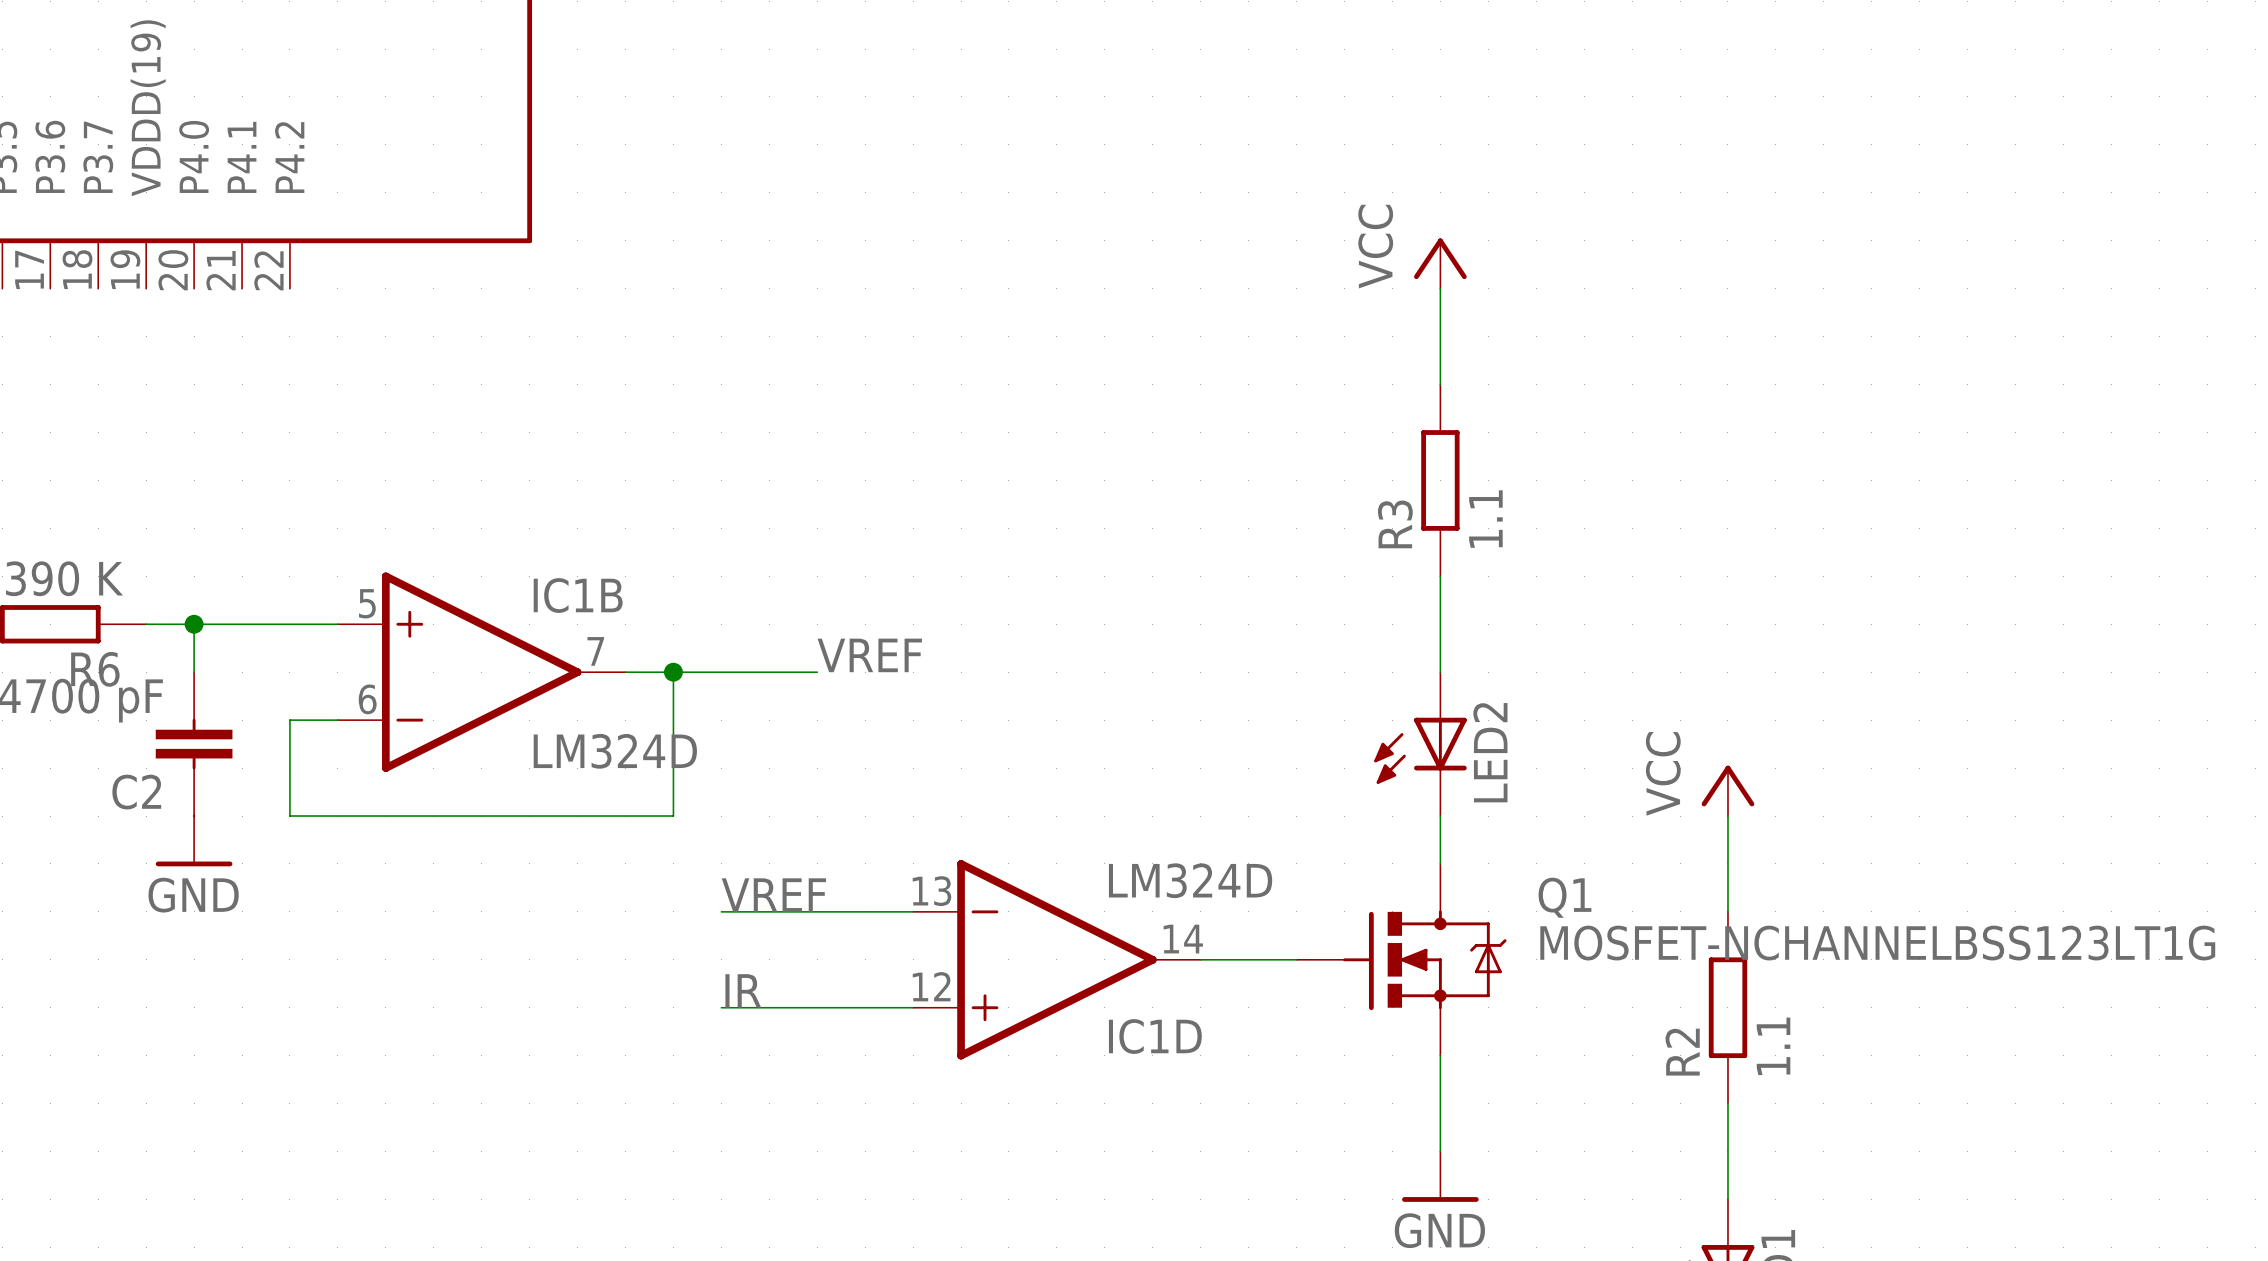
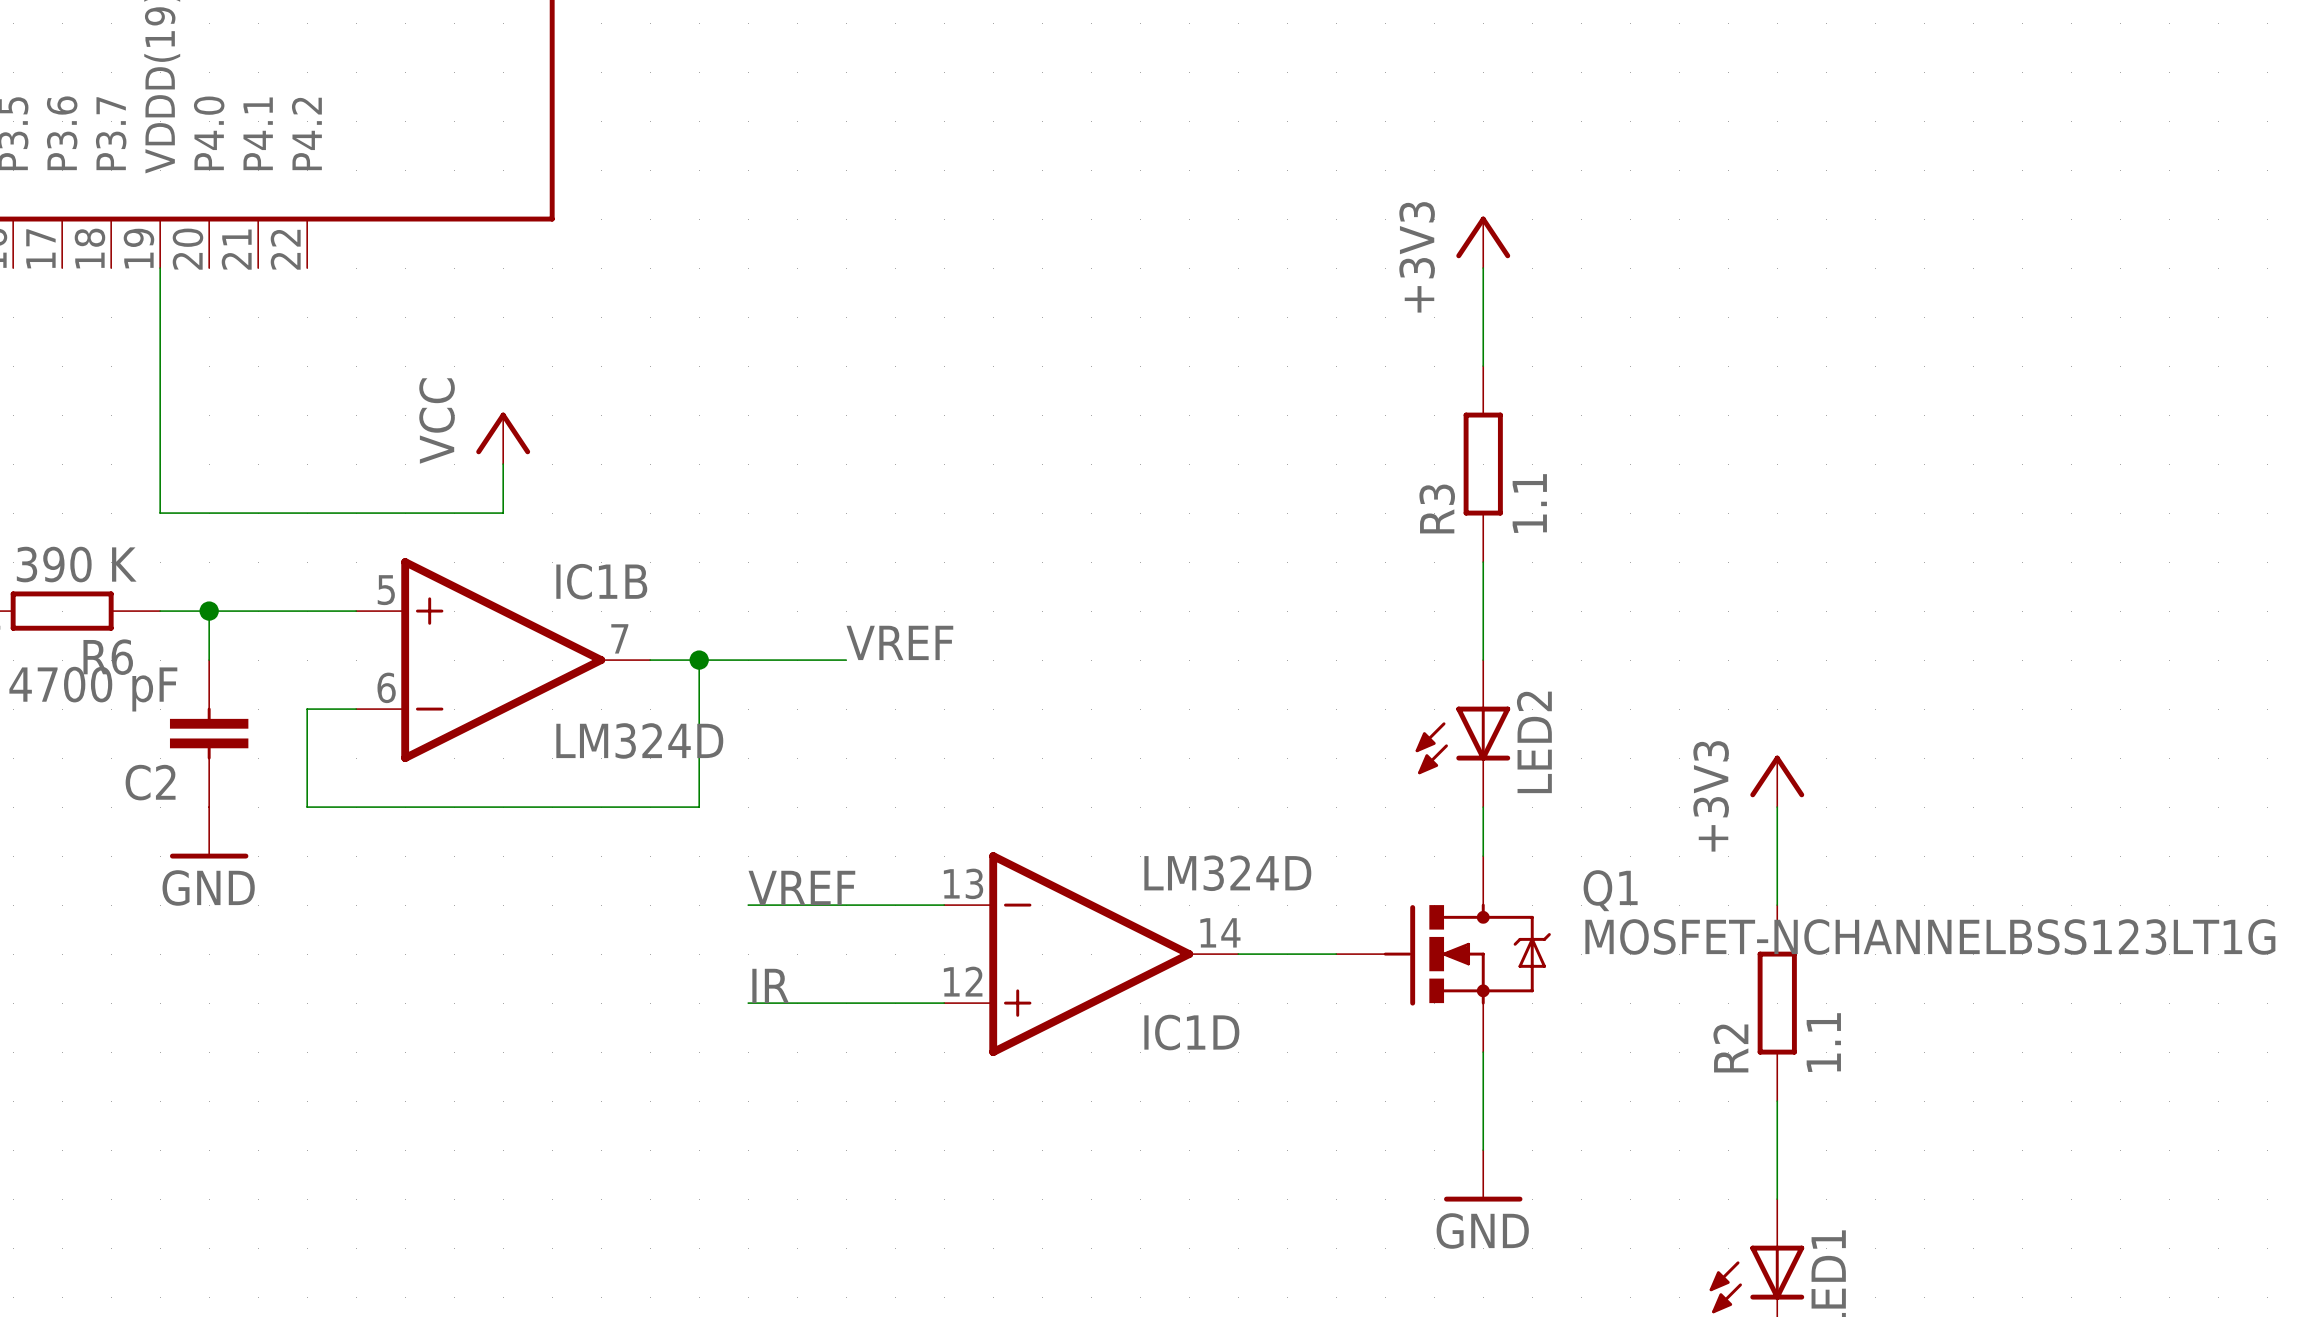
power symbol: VCC (1440, 263) -> +3V3 (1483, 242)
wire: none -> (160, 268) (160, 513) (503, 513) (503, 464)
power symbol: none -> VCC (503, 438)
power symbol: VCC (1727, 790) -> +3V3 (1777, 781)

